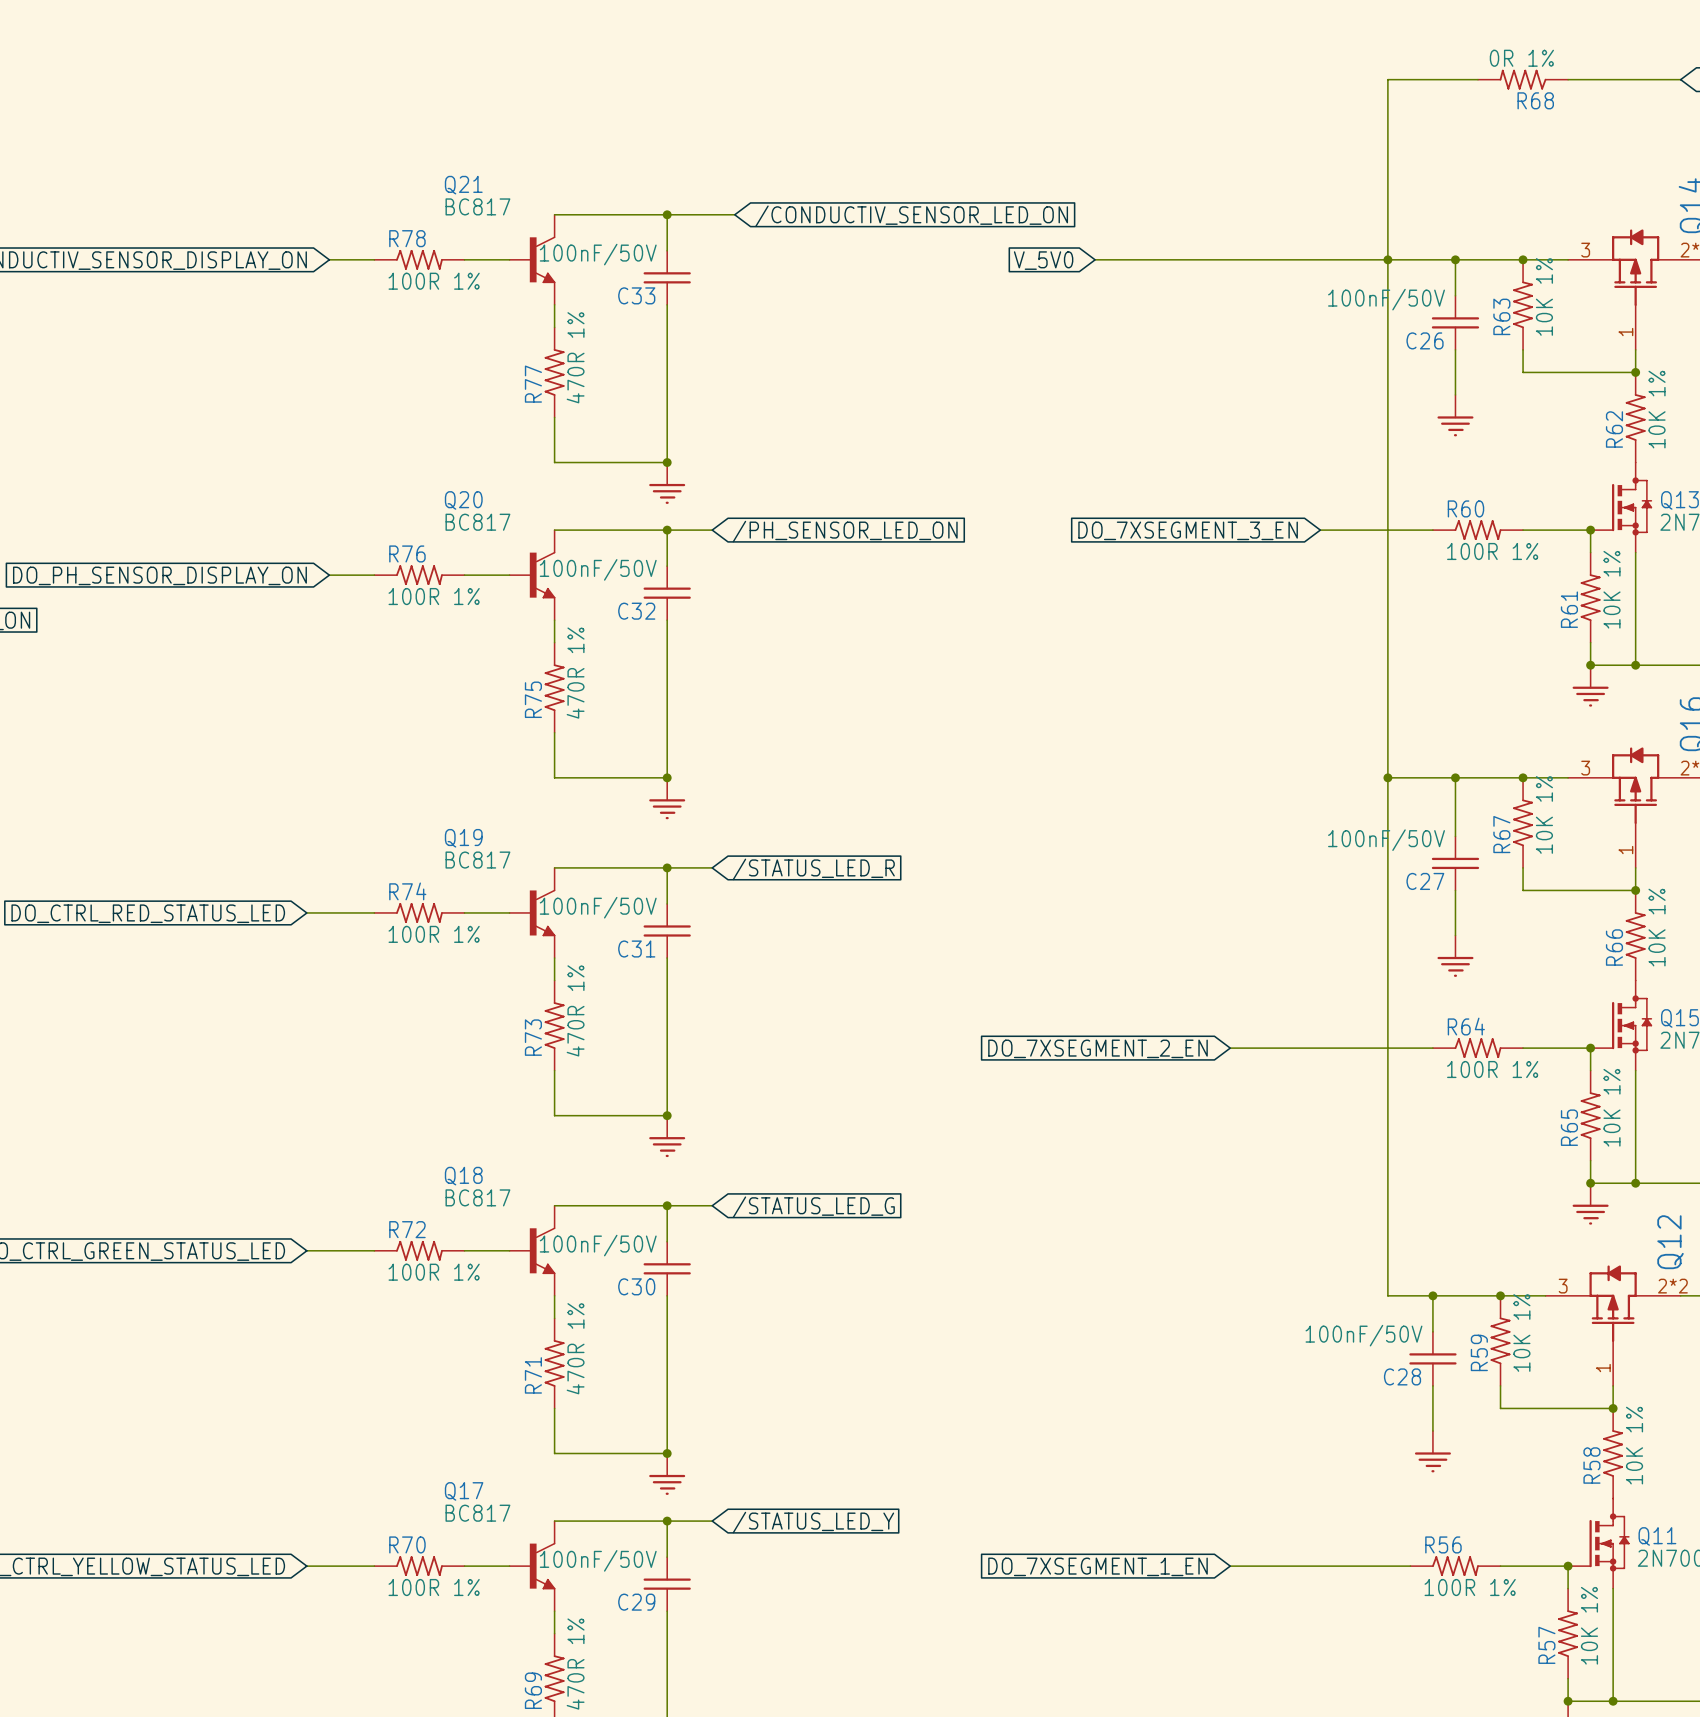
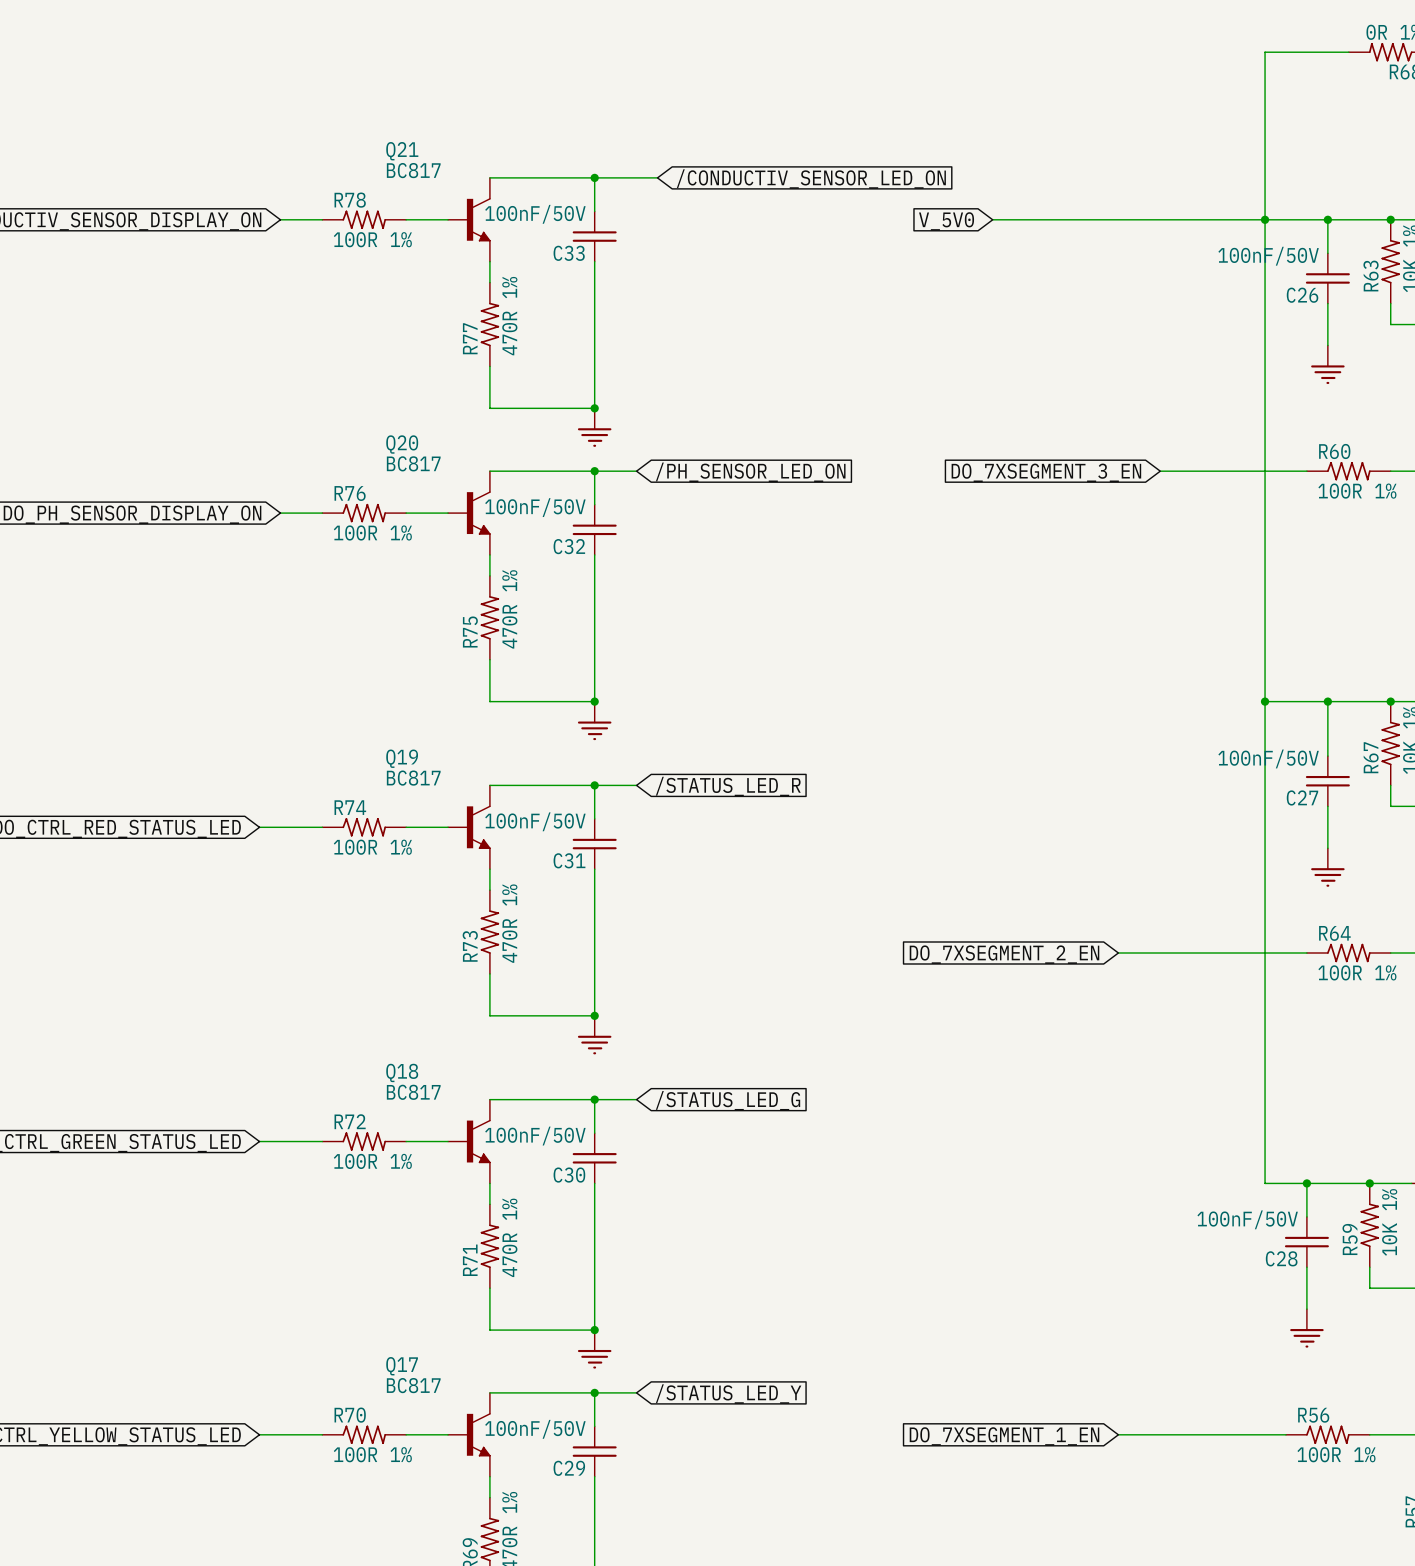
global label position: DO_7XSEGMENT_3_EN (1188, 530) -> DO_7XSEGMENT_3_EN (1046, 472)
wire: none -> (1160, 471) (1202, 471)

